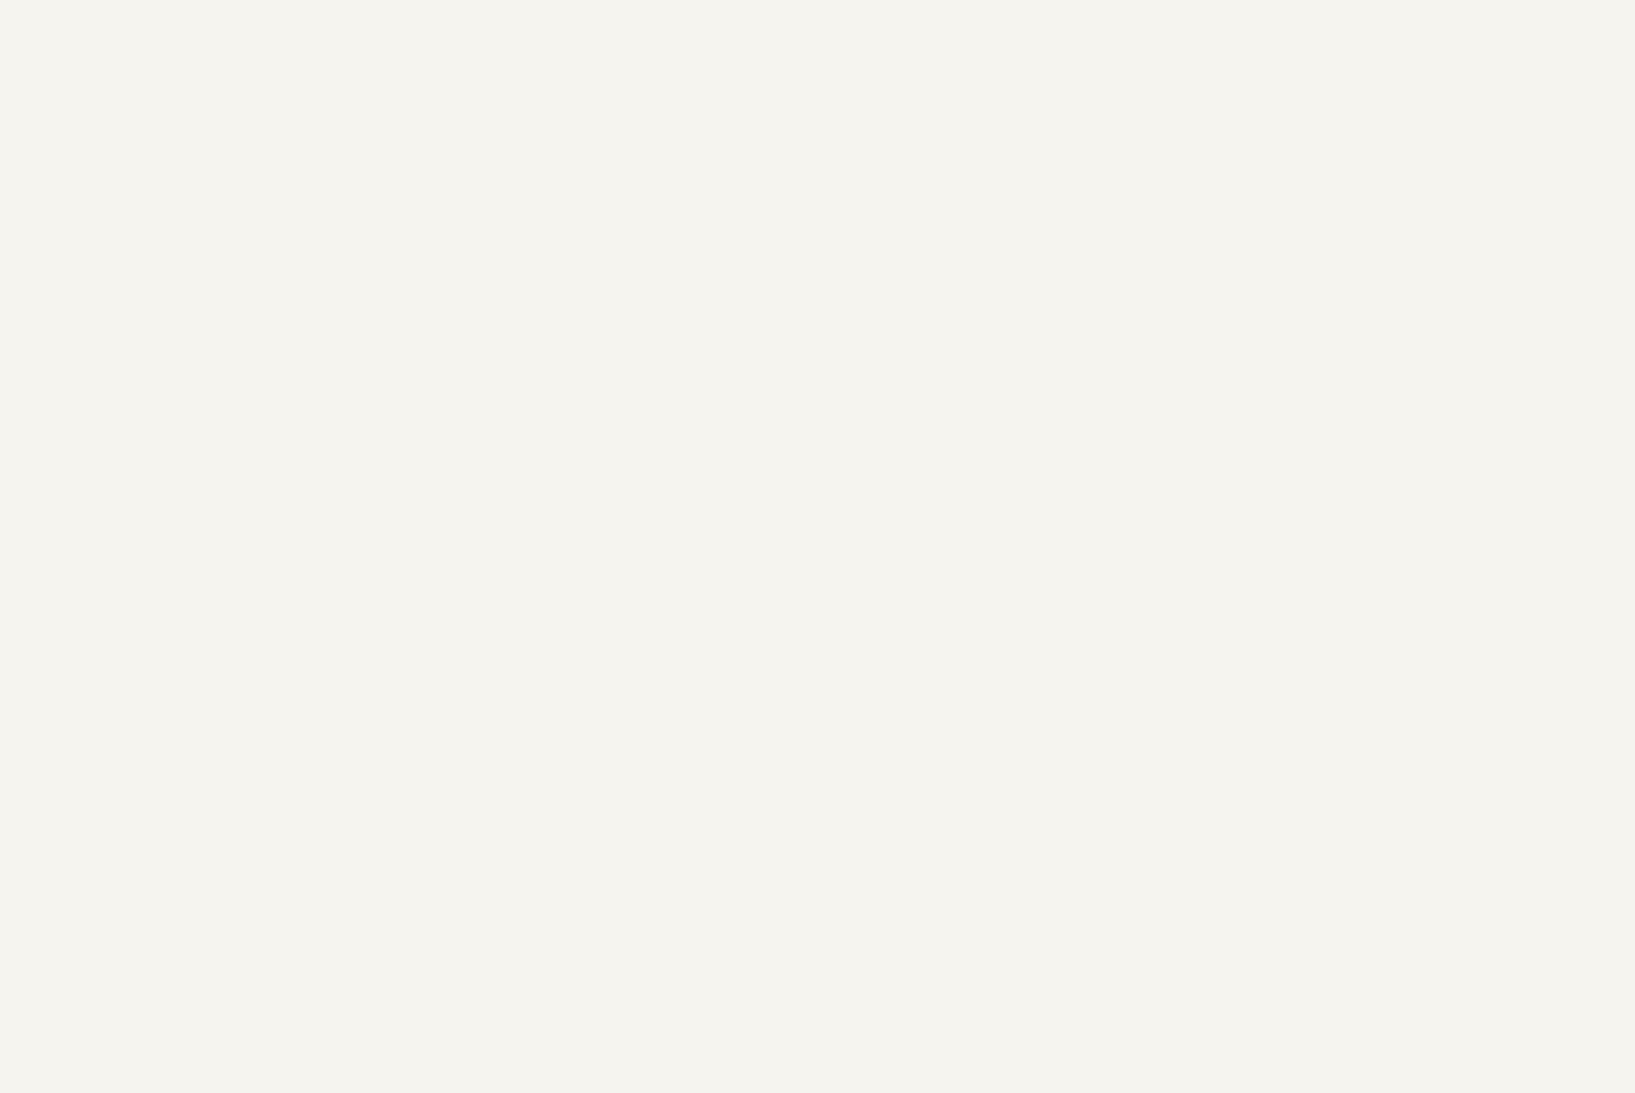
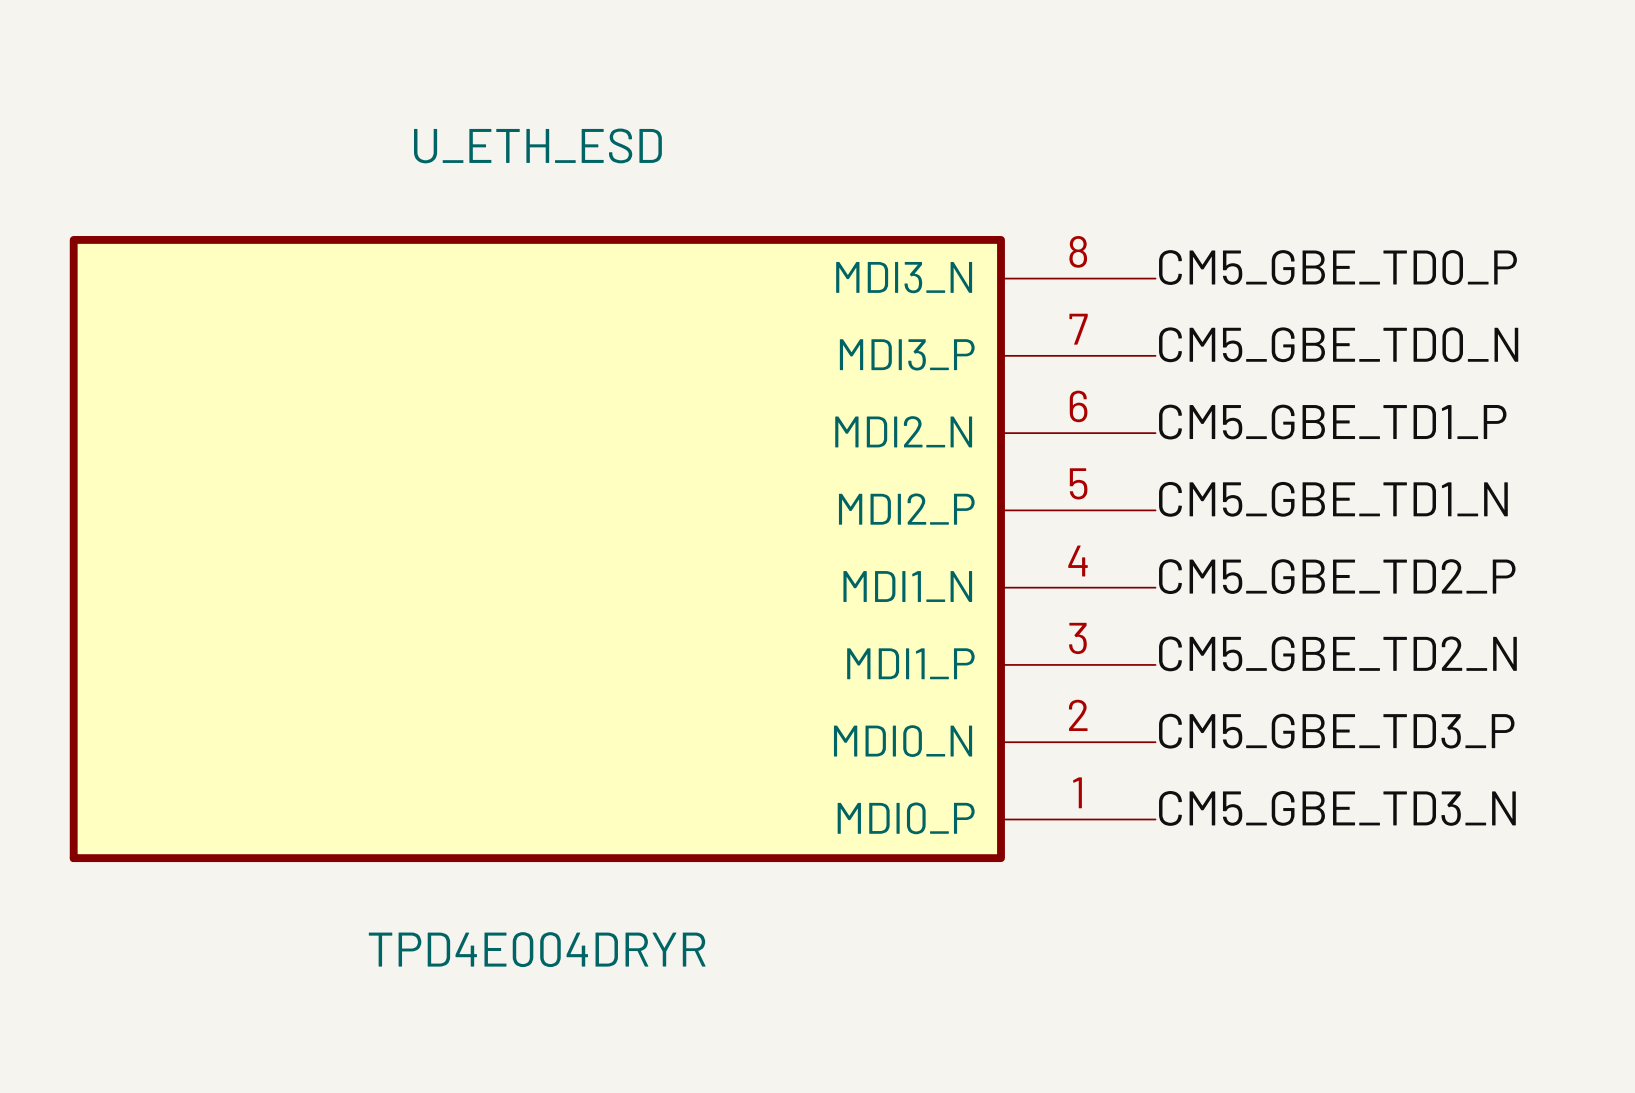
label: none -> CM5_GBE_TD0_P (1337, 267)
label: none -> CM5_GBE_TD0_N (1338, 344)
label: none -> CM5_GBE_TD1_P (1332, 422)
label: none -> CM5_GBE_TD1_N (1333, 499)
U_ETH_ESD: none -> TPD4E004DRYR (612, 549)
label: none -> CM5_GBE_TD2_P (1337, 576)
label: none -> CM5_GBE_TD2_N (1337, 653)
label: none -> CM5_GBE_TD3_P (1336, 731)
label: none -> CM5_GBE_TD3_N (1337, 808)

